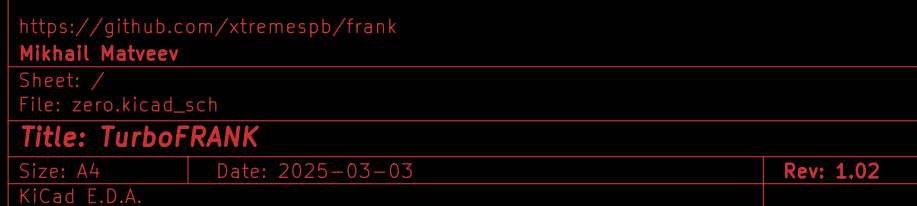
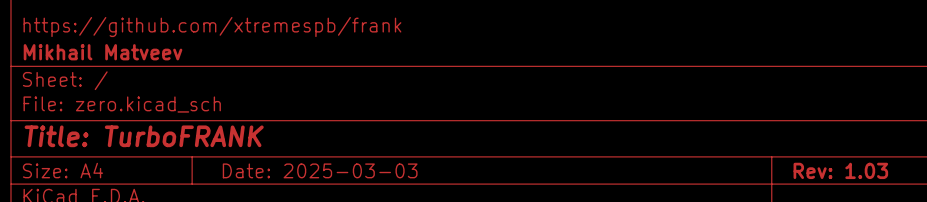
title block: Rev: 1.02 (831, 170) -> Rev: 1.03 (840, 170)

